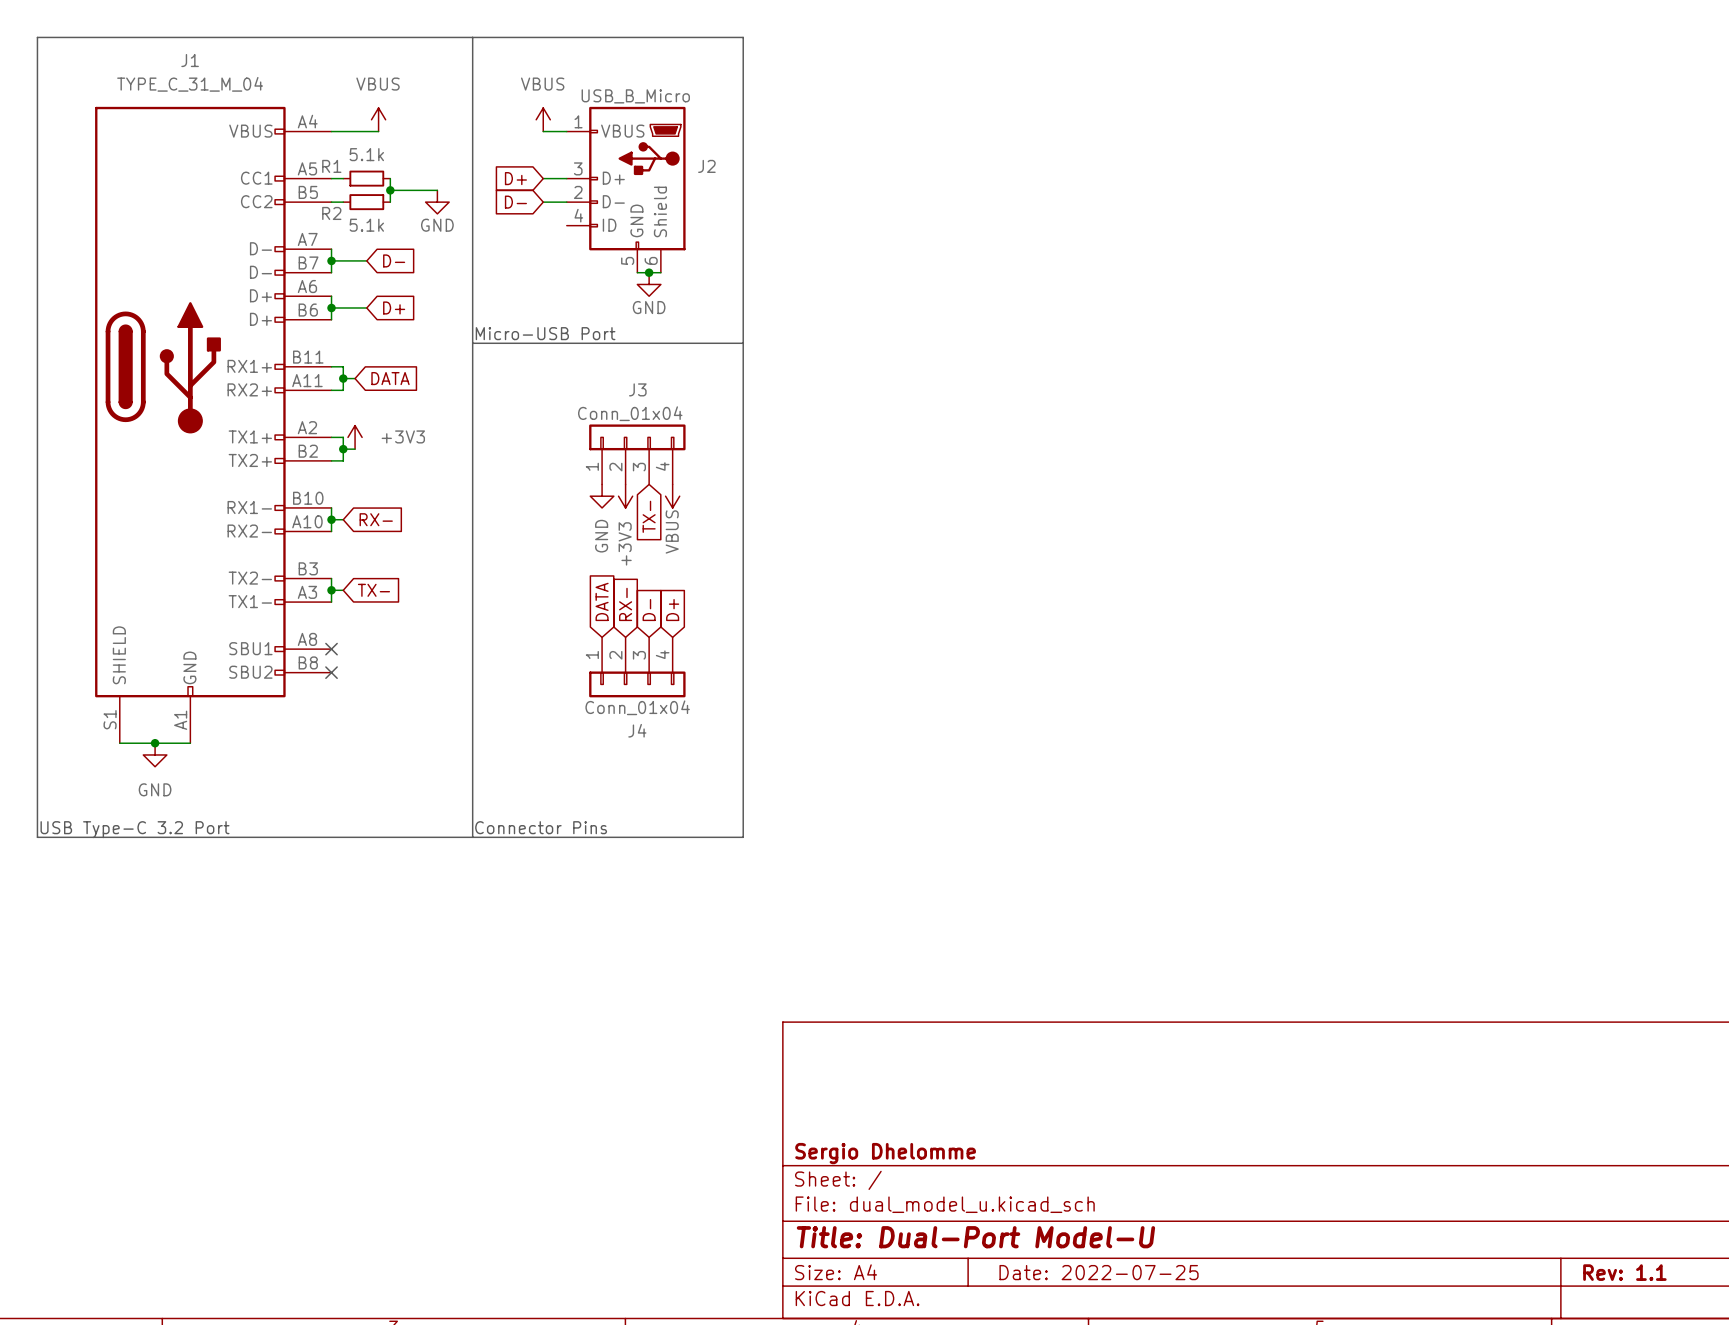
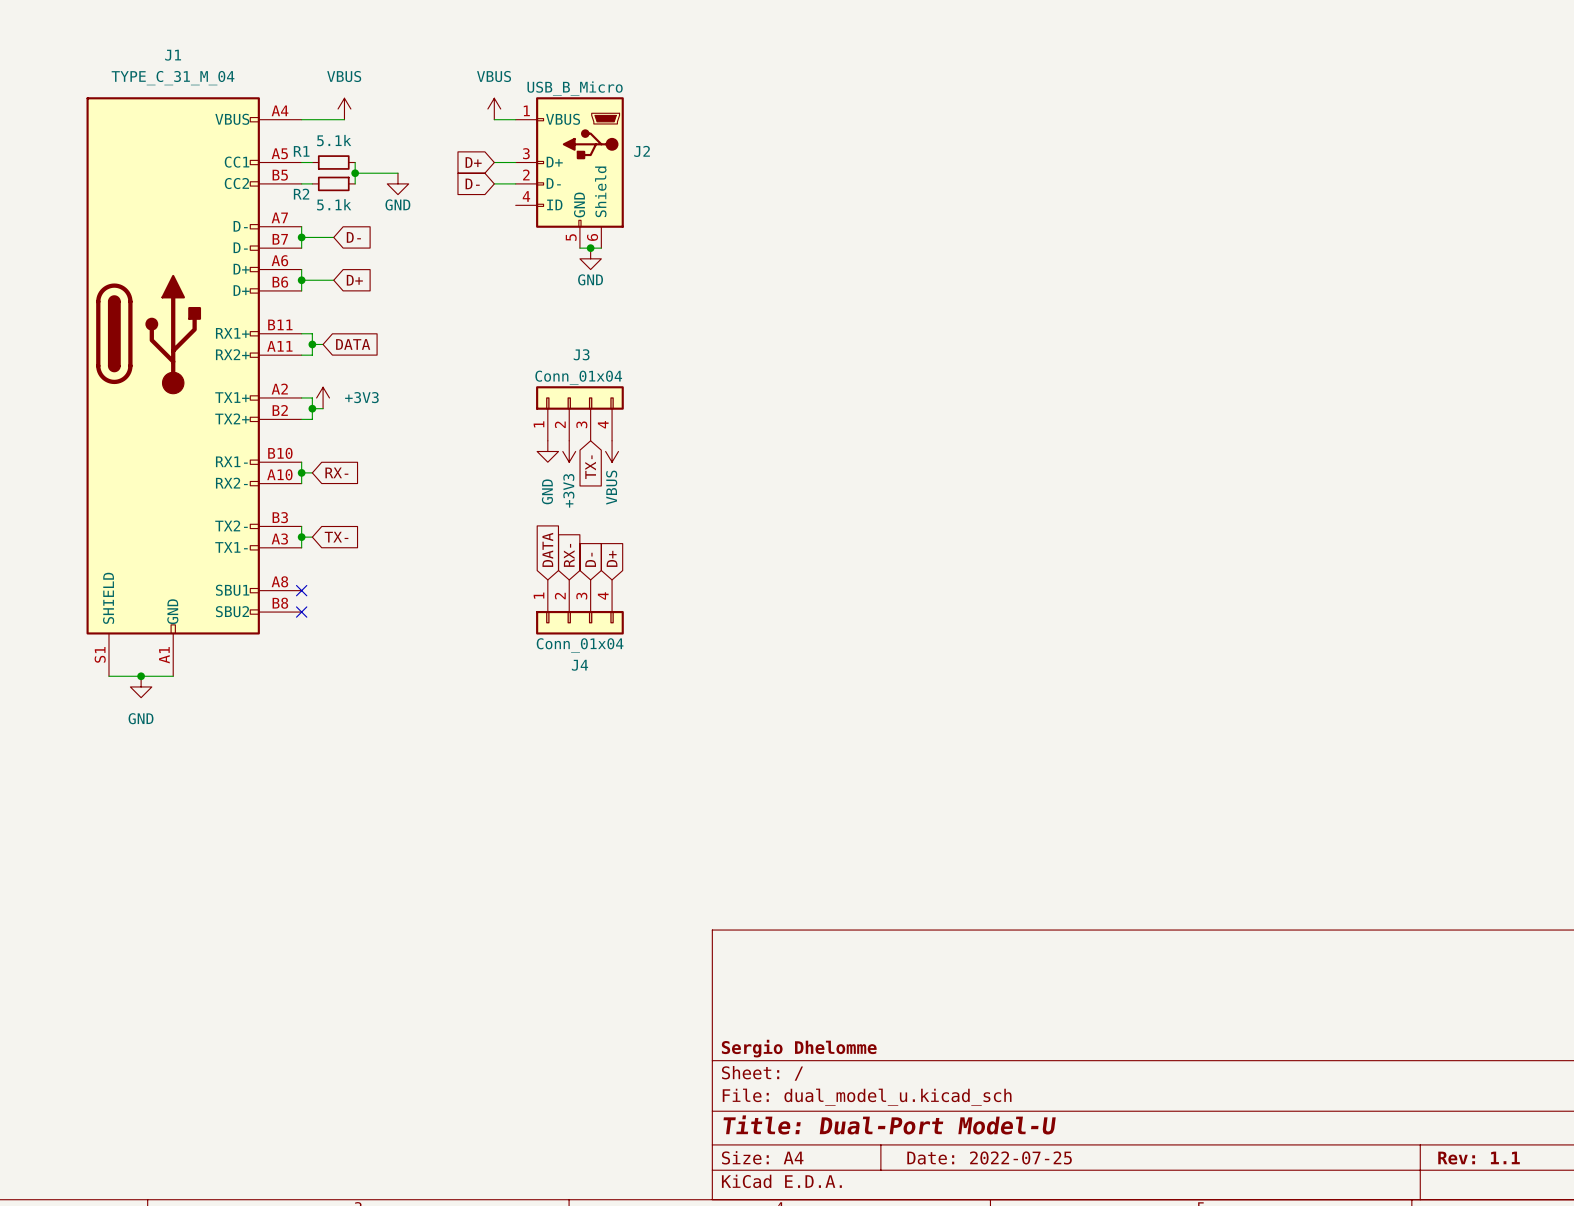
line: (37, 37) (37, 837) (743, 837) (743, 37) (37, 37) -> none
line: (472, 37) (472, 837) -> none
text: Micro-USB Port (545, 333) -> none
line: (472, 343) (743, 343) -> none
text: Connector Pins (541, 827) -> none
text: USB Type-C 3.2 Port (135, 829) -> none

